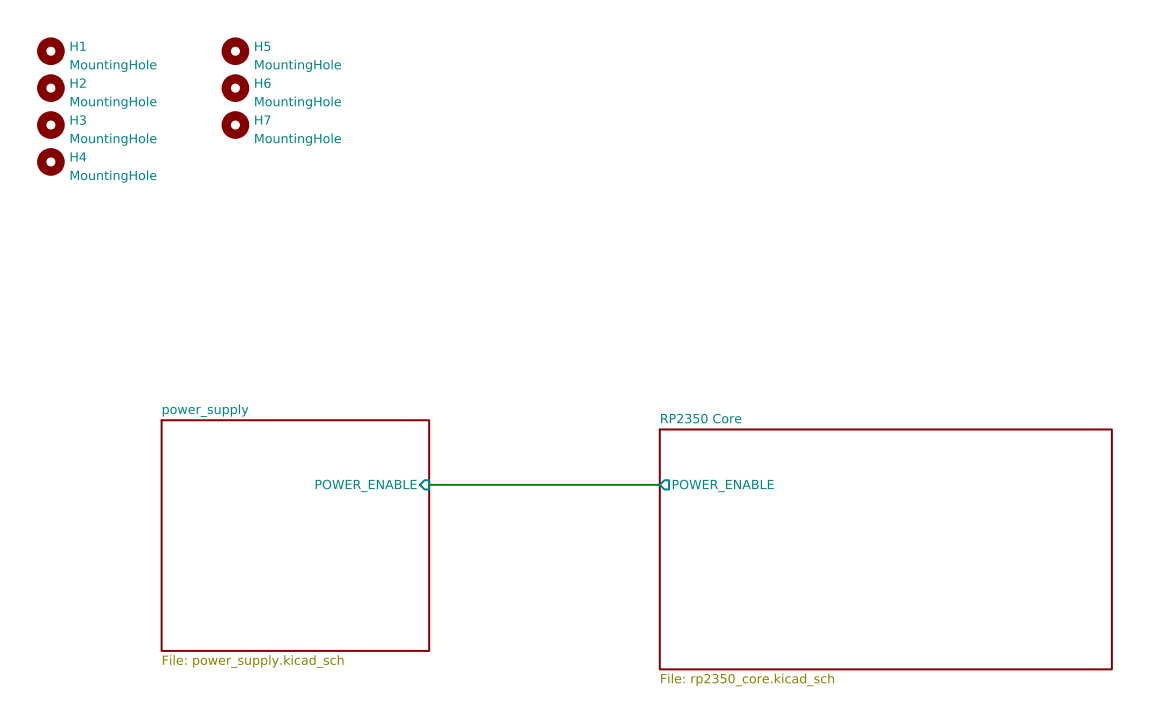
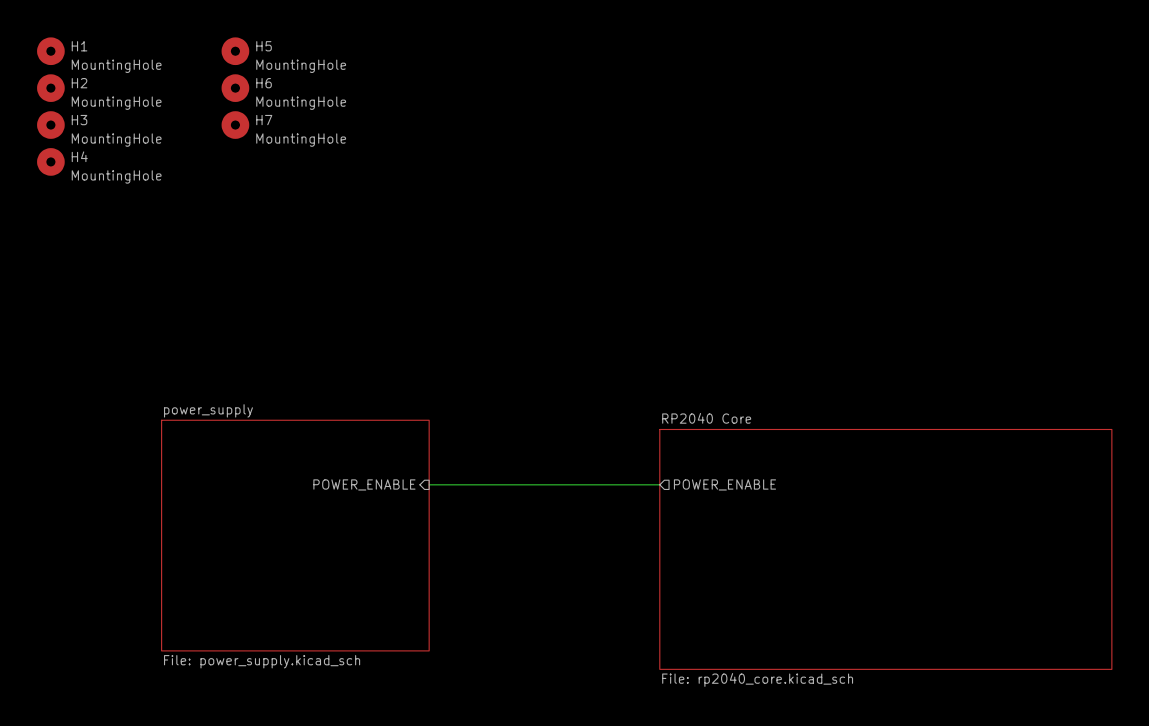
sheet RP2350 Core name: RP2350 Core (701, 418) -> RP2040 Core (706, 418)
sheet RP2350 Core value: File: rp2350_core.kicad_sch (747, 679) -> File: rp2040_core.kicad_sch (757, 679)

